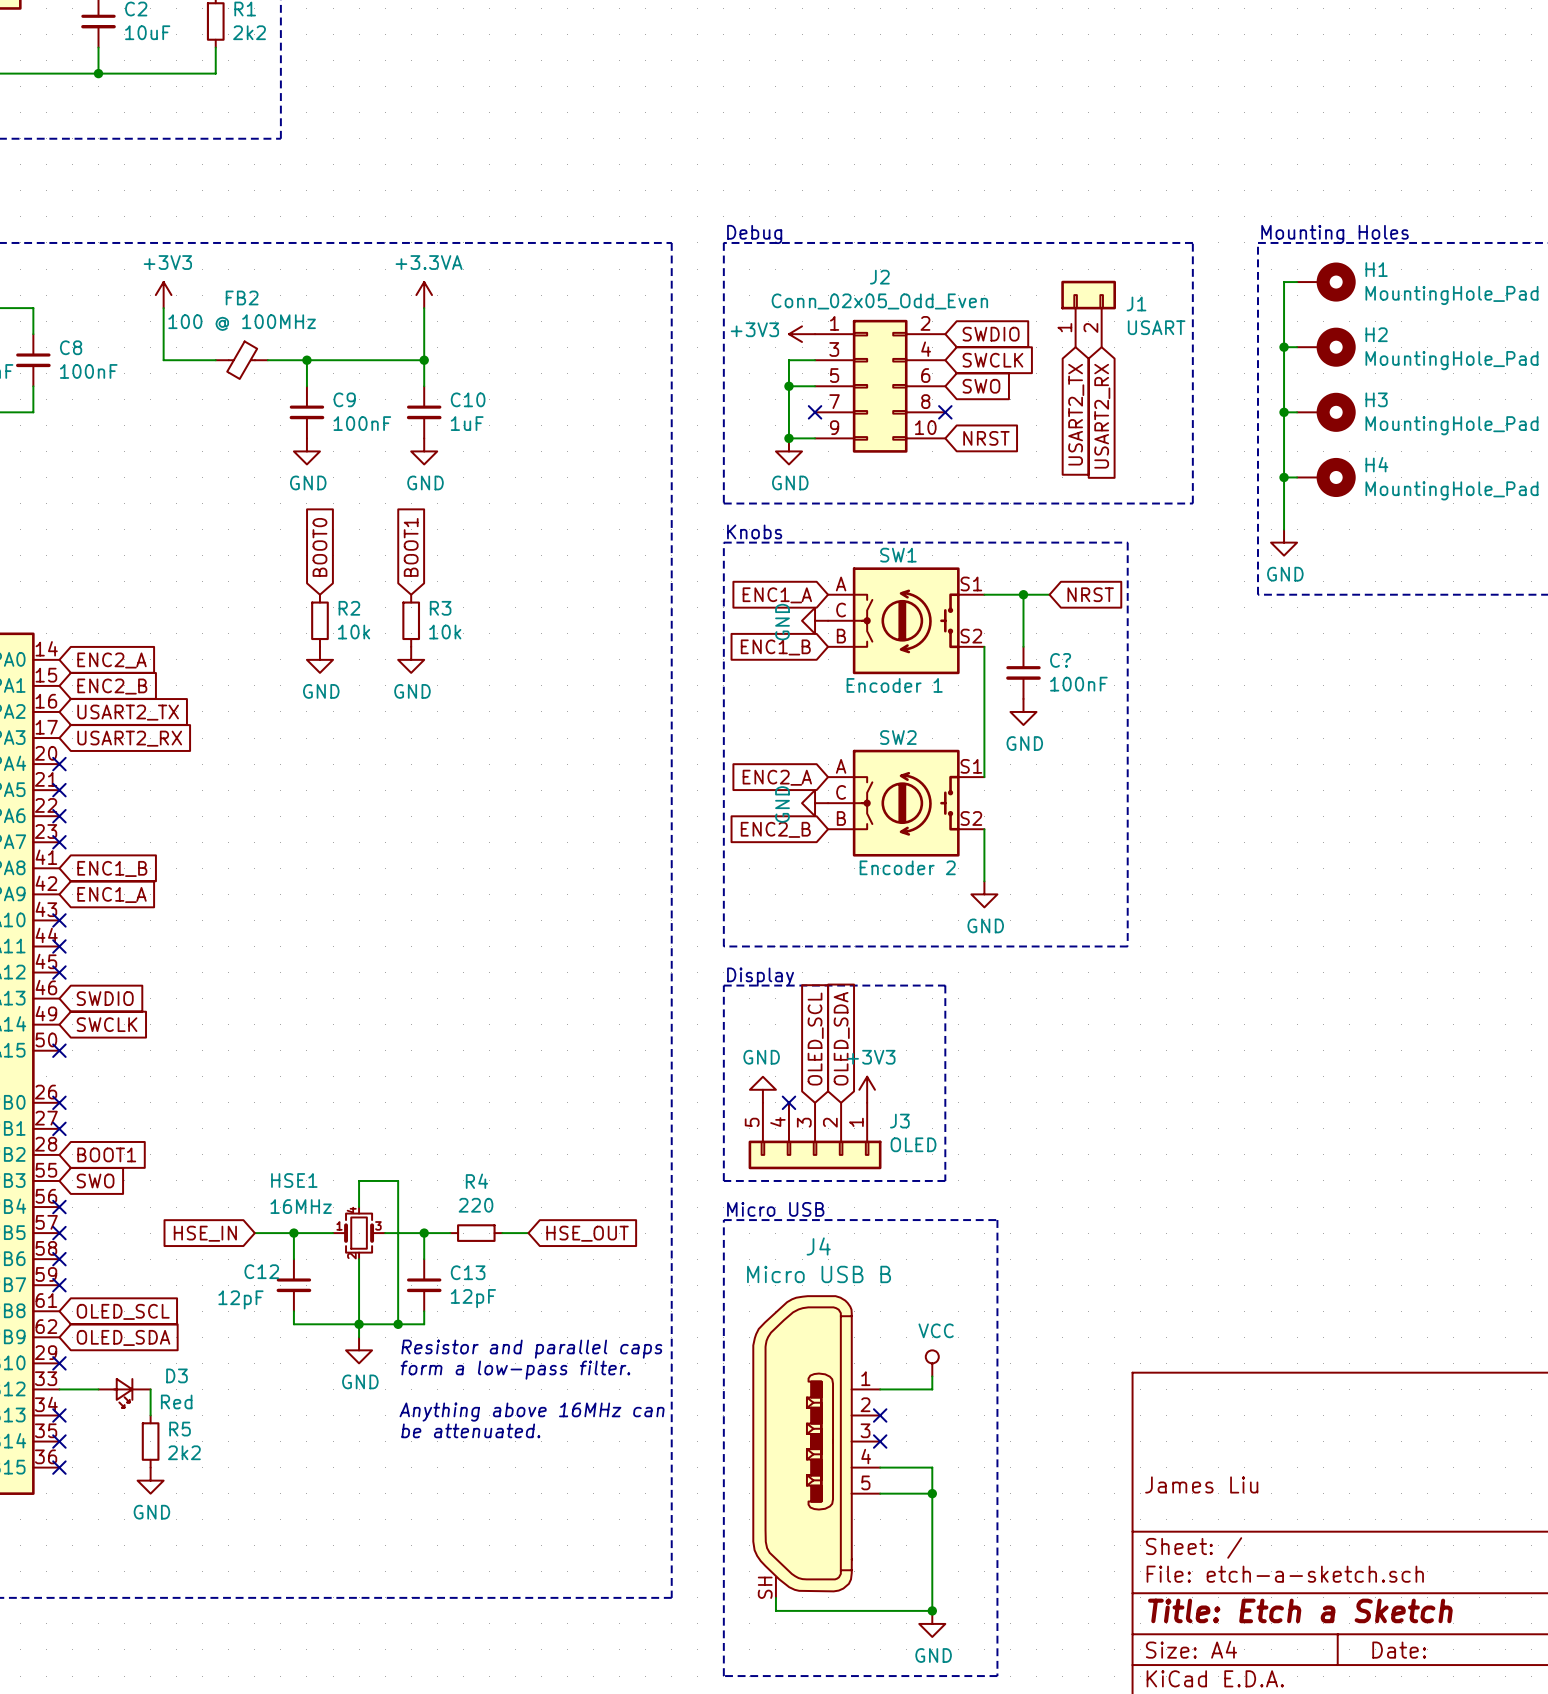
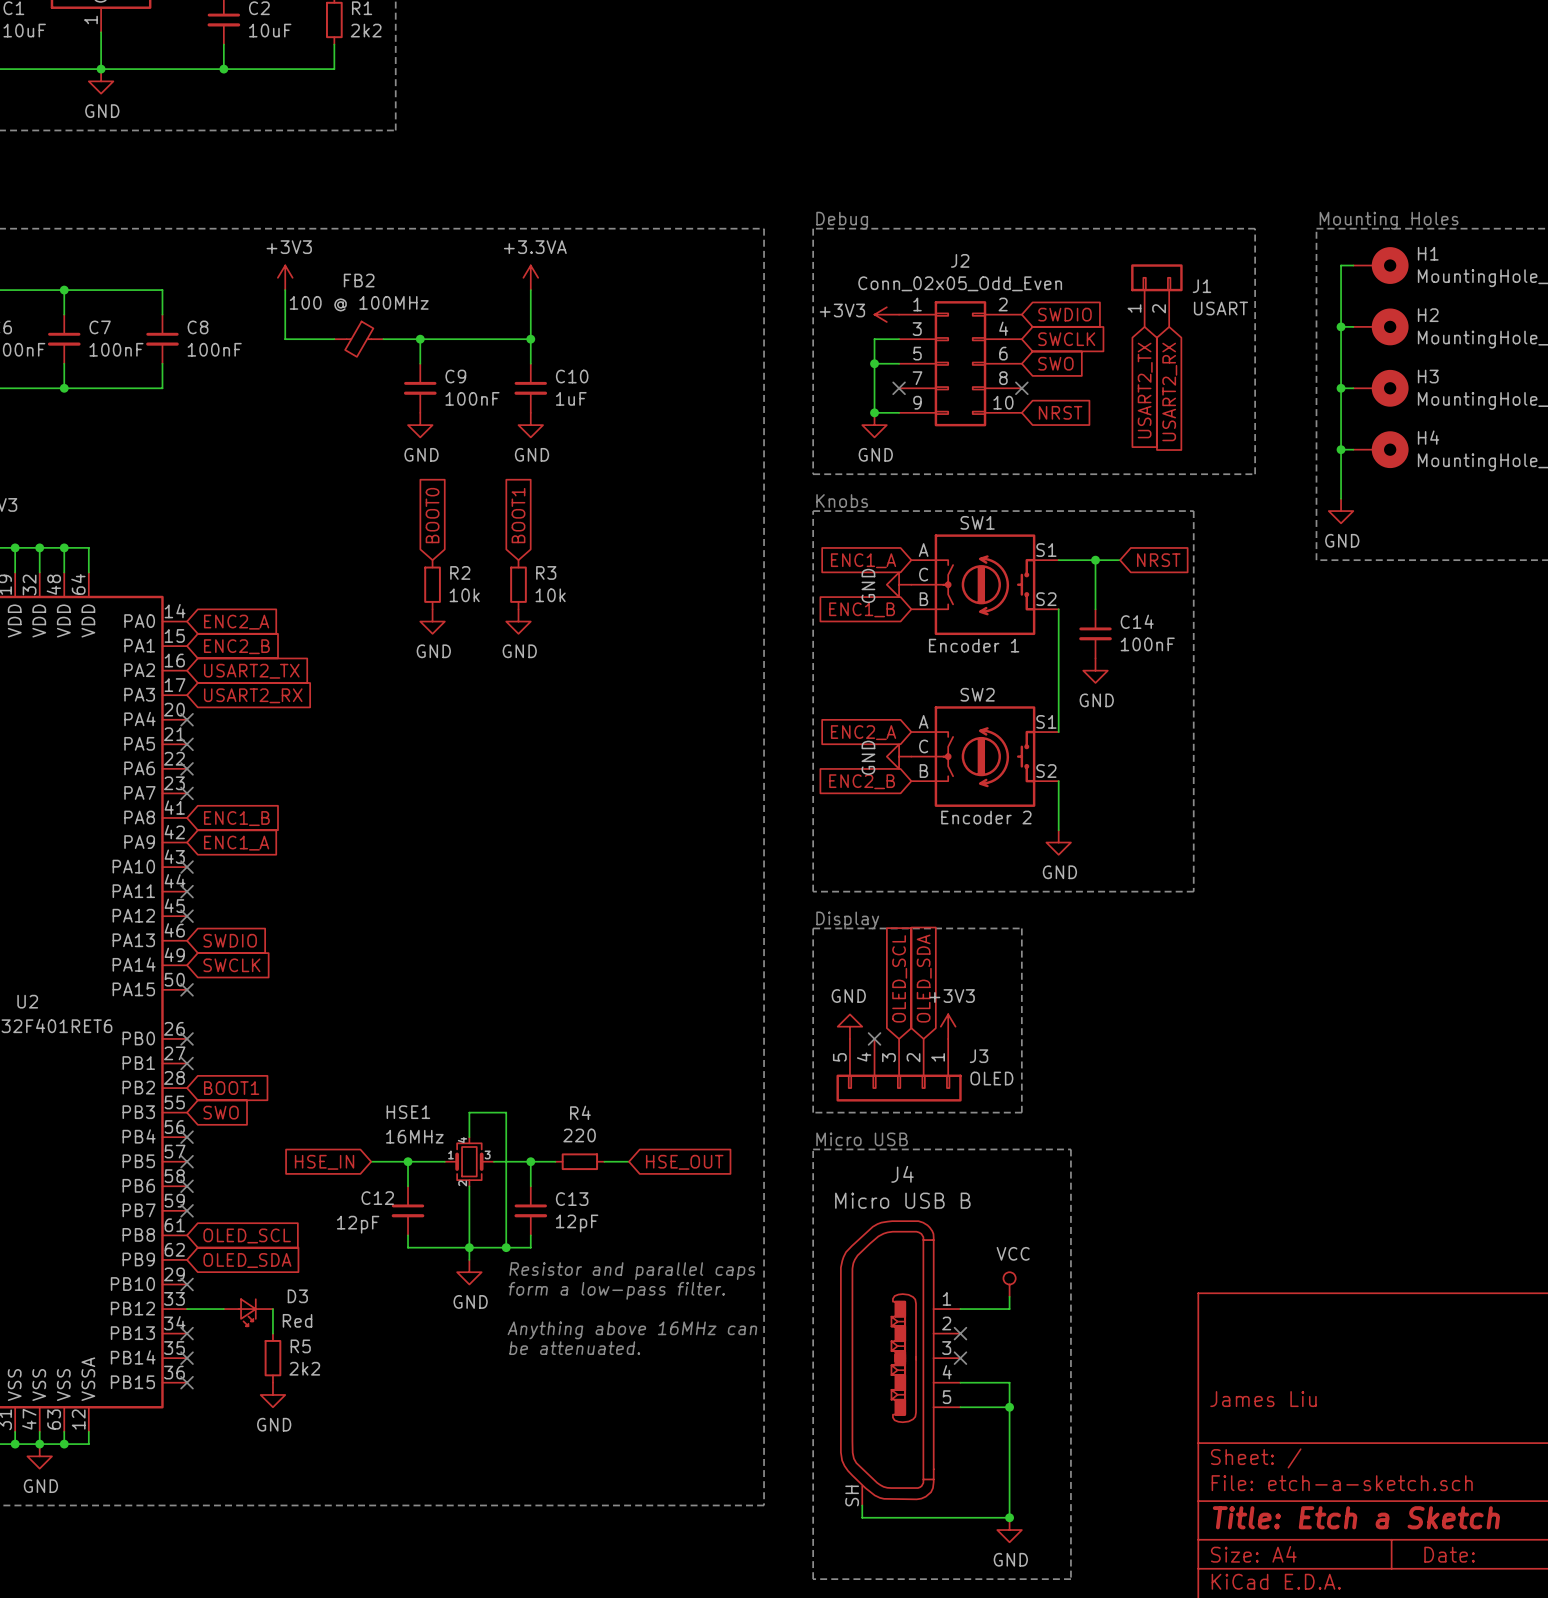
C? name: C? (1060, 660) -> C14 (1137, 621)

